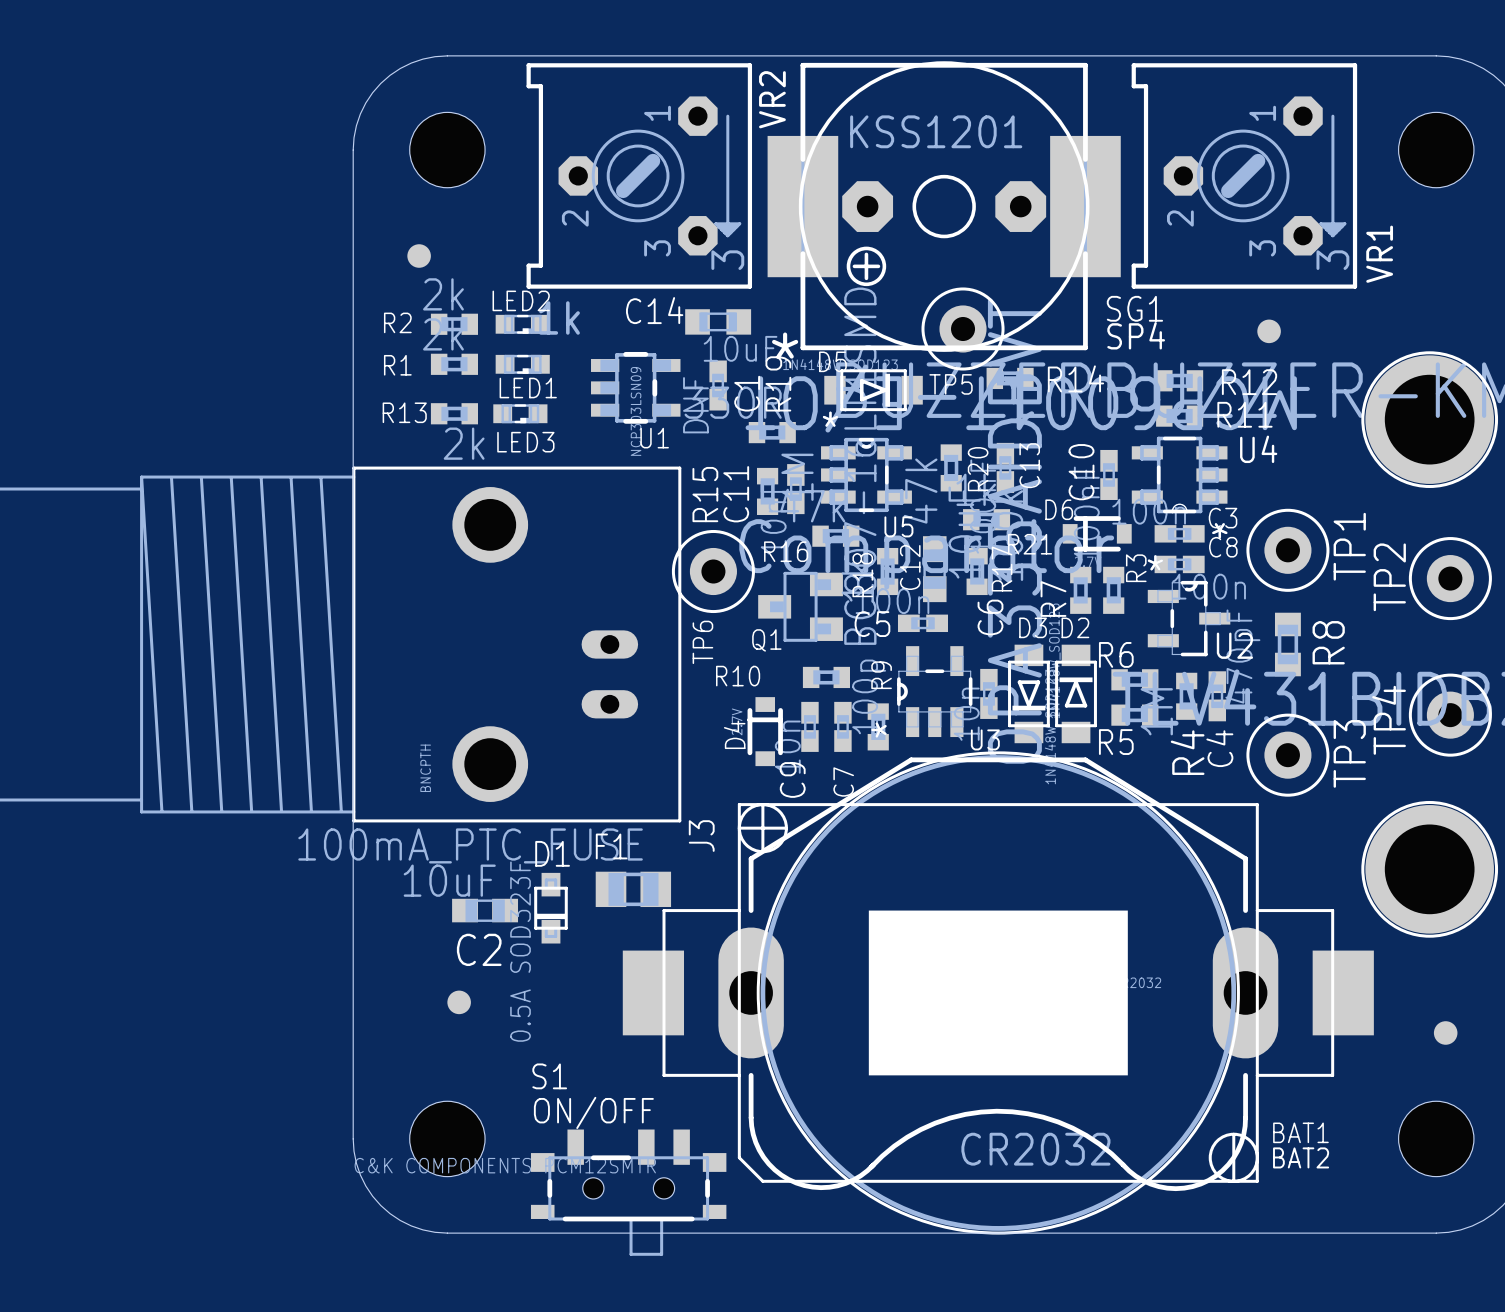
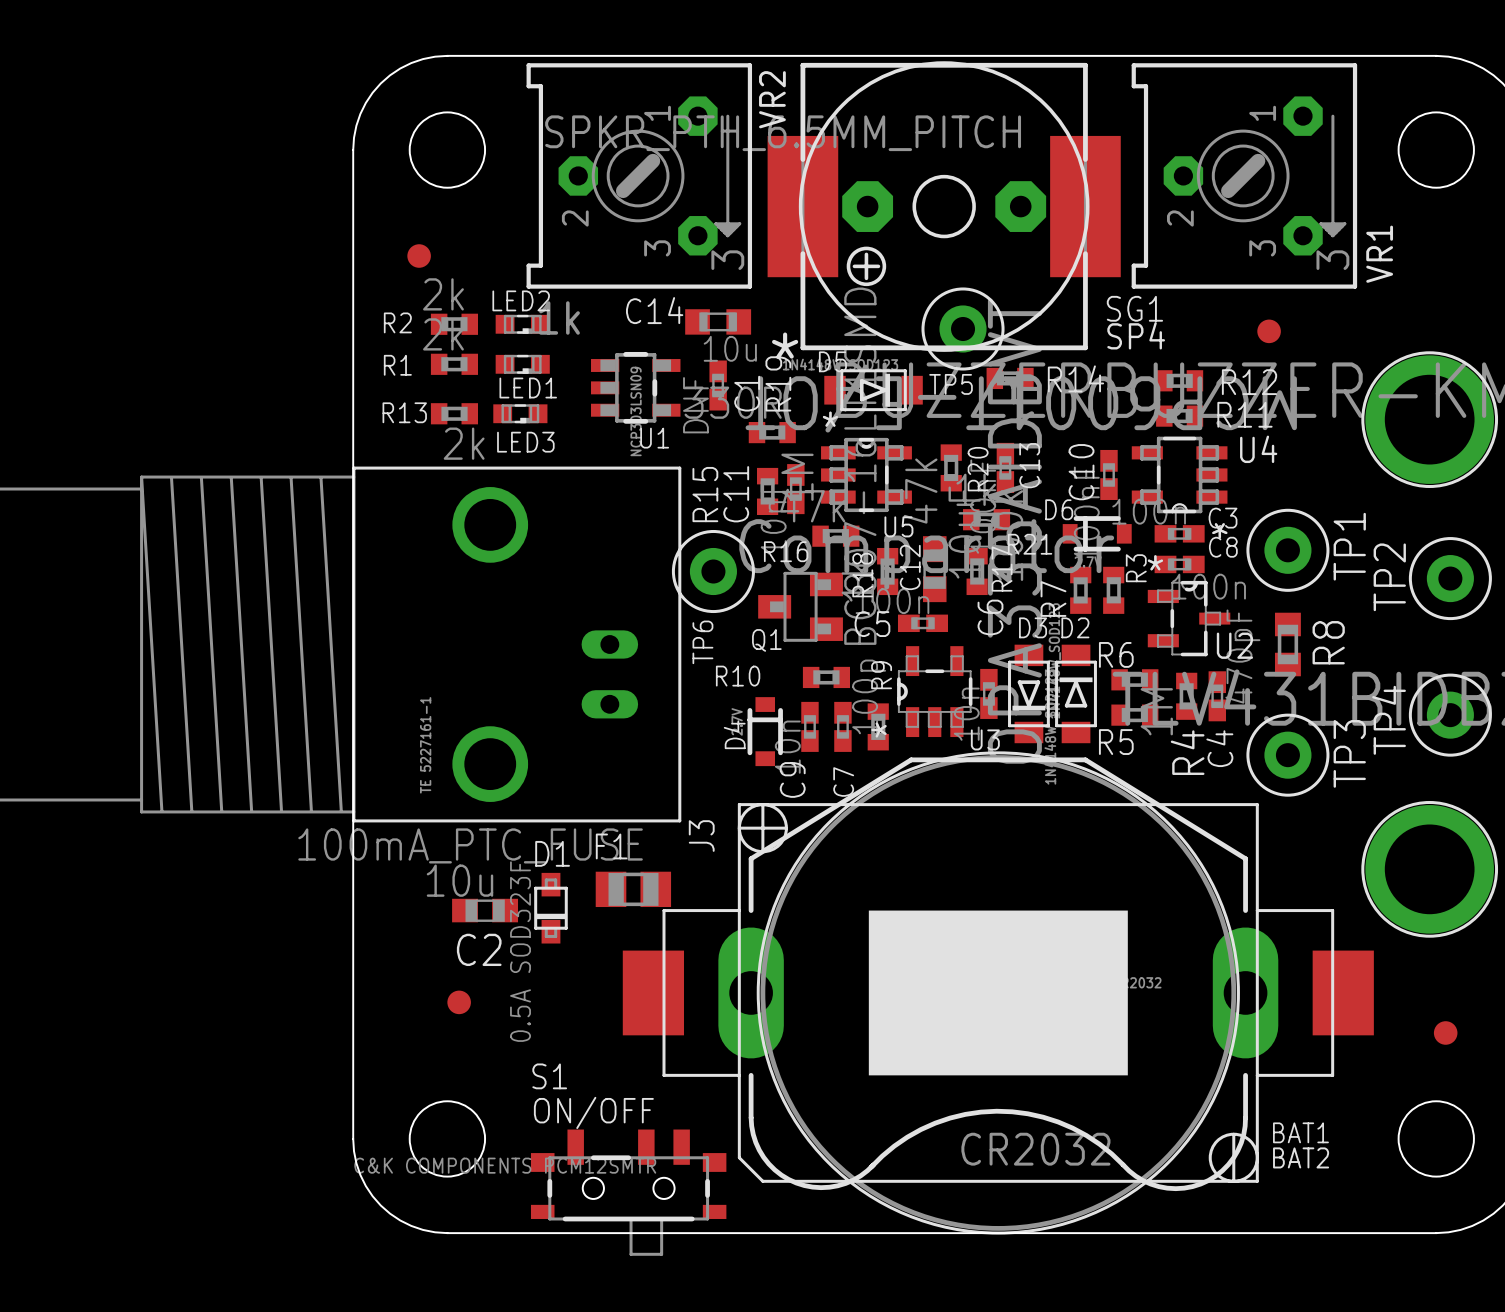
SP4 value: KSS1201 (936, 131) -> SPKR_PTH_6.5MM_PITCH (783, 133)
C14 value: 10uF (740, 348) -> 10u (730, 348)
J3 value: BNCPTH (425, 768) -> TE 5227161-1 (425, 745)
C2 value: 10uF (449, 880) -> 10u (459, 880)

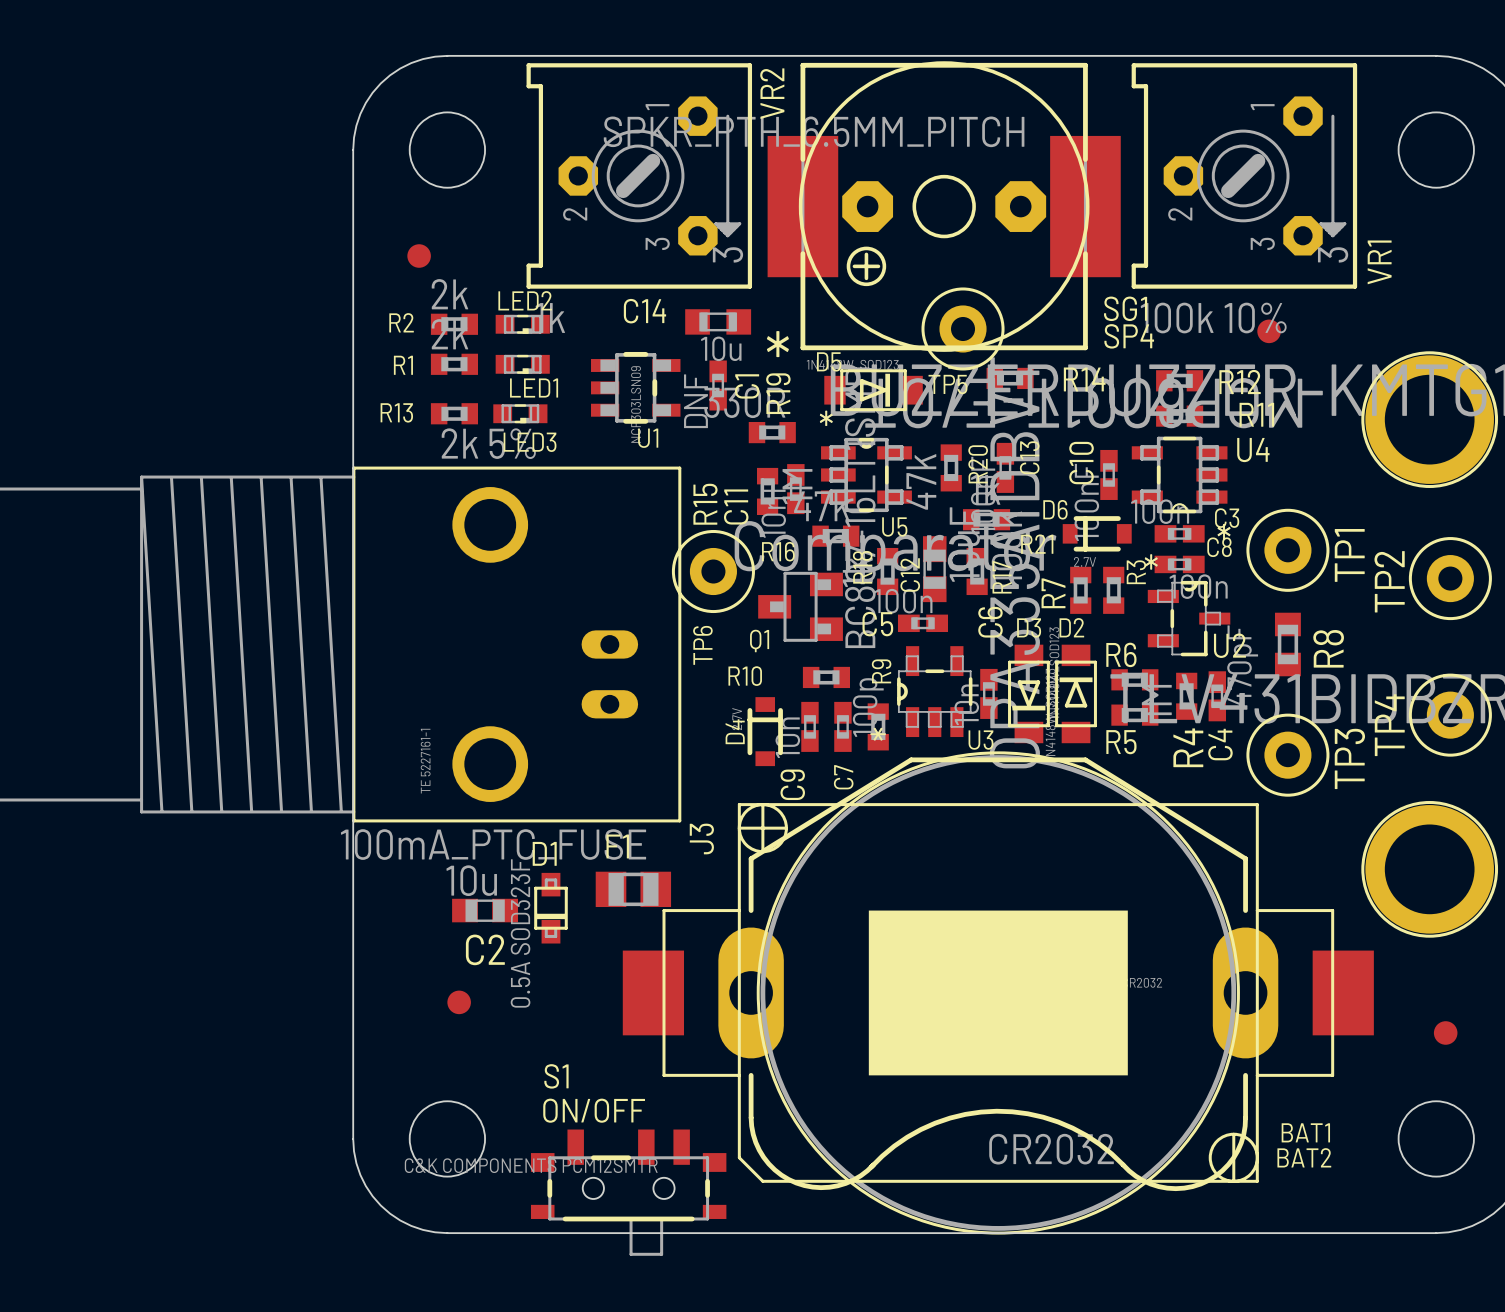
VR1 value: none -> 100k 10% (1213, 318)
R13 value: 2k (464, 443) -> 2k 5% (488, 443)

